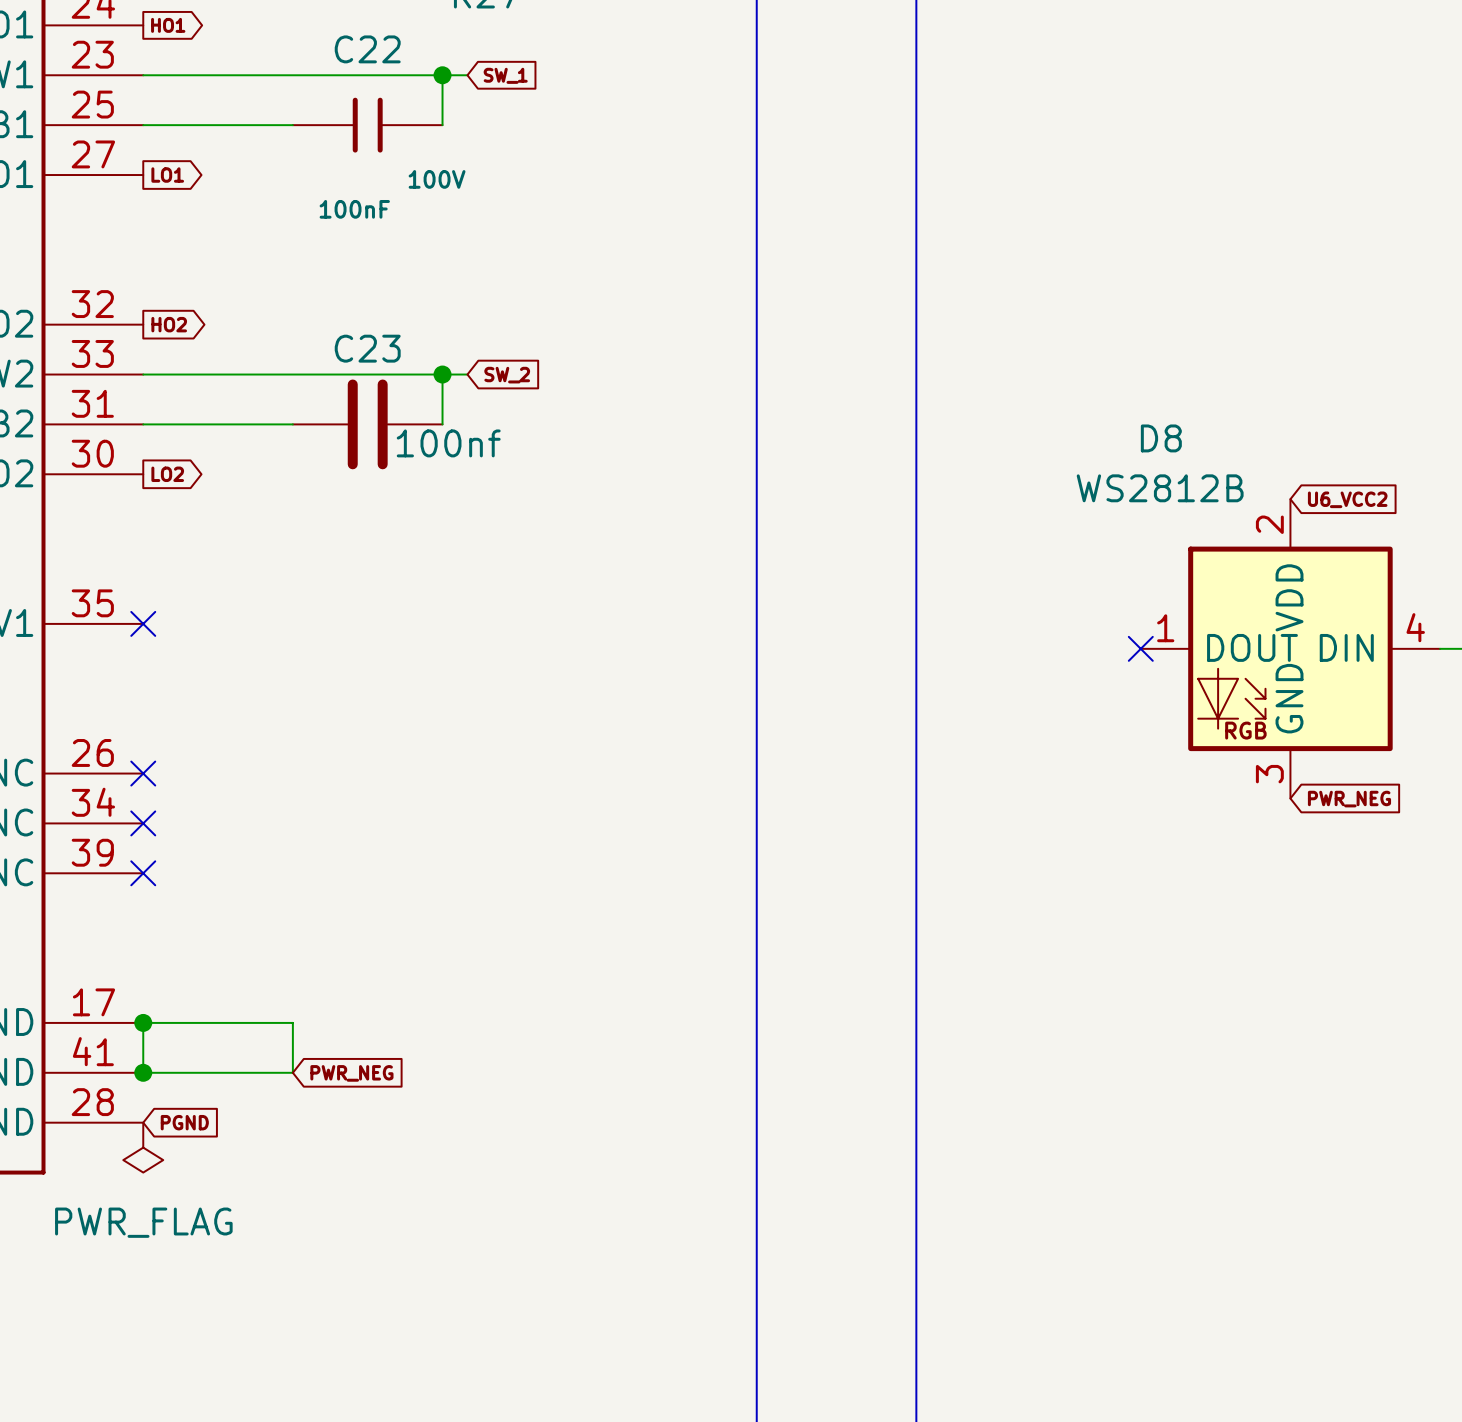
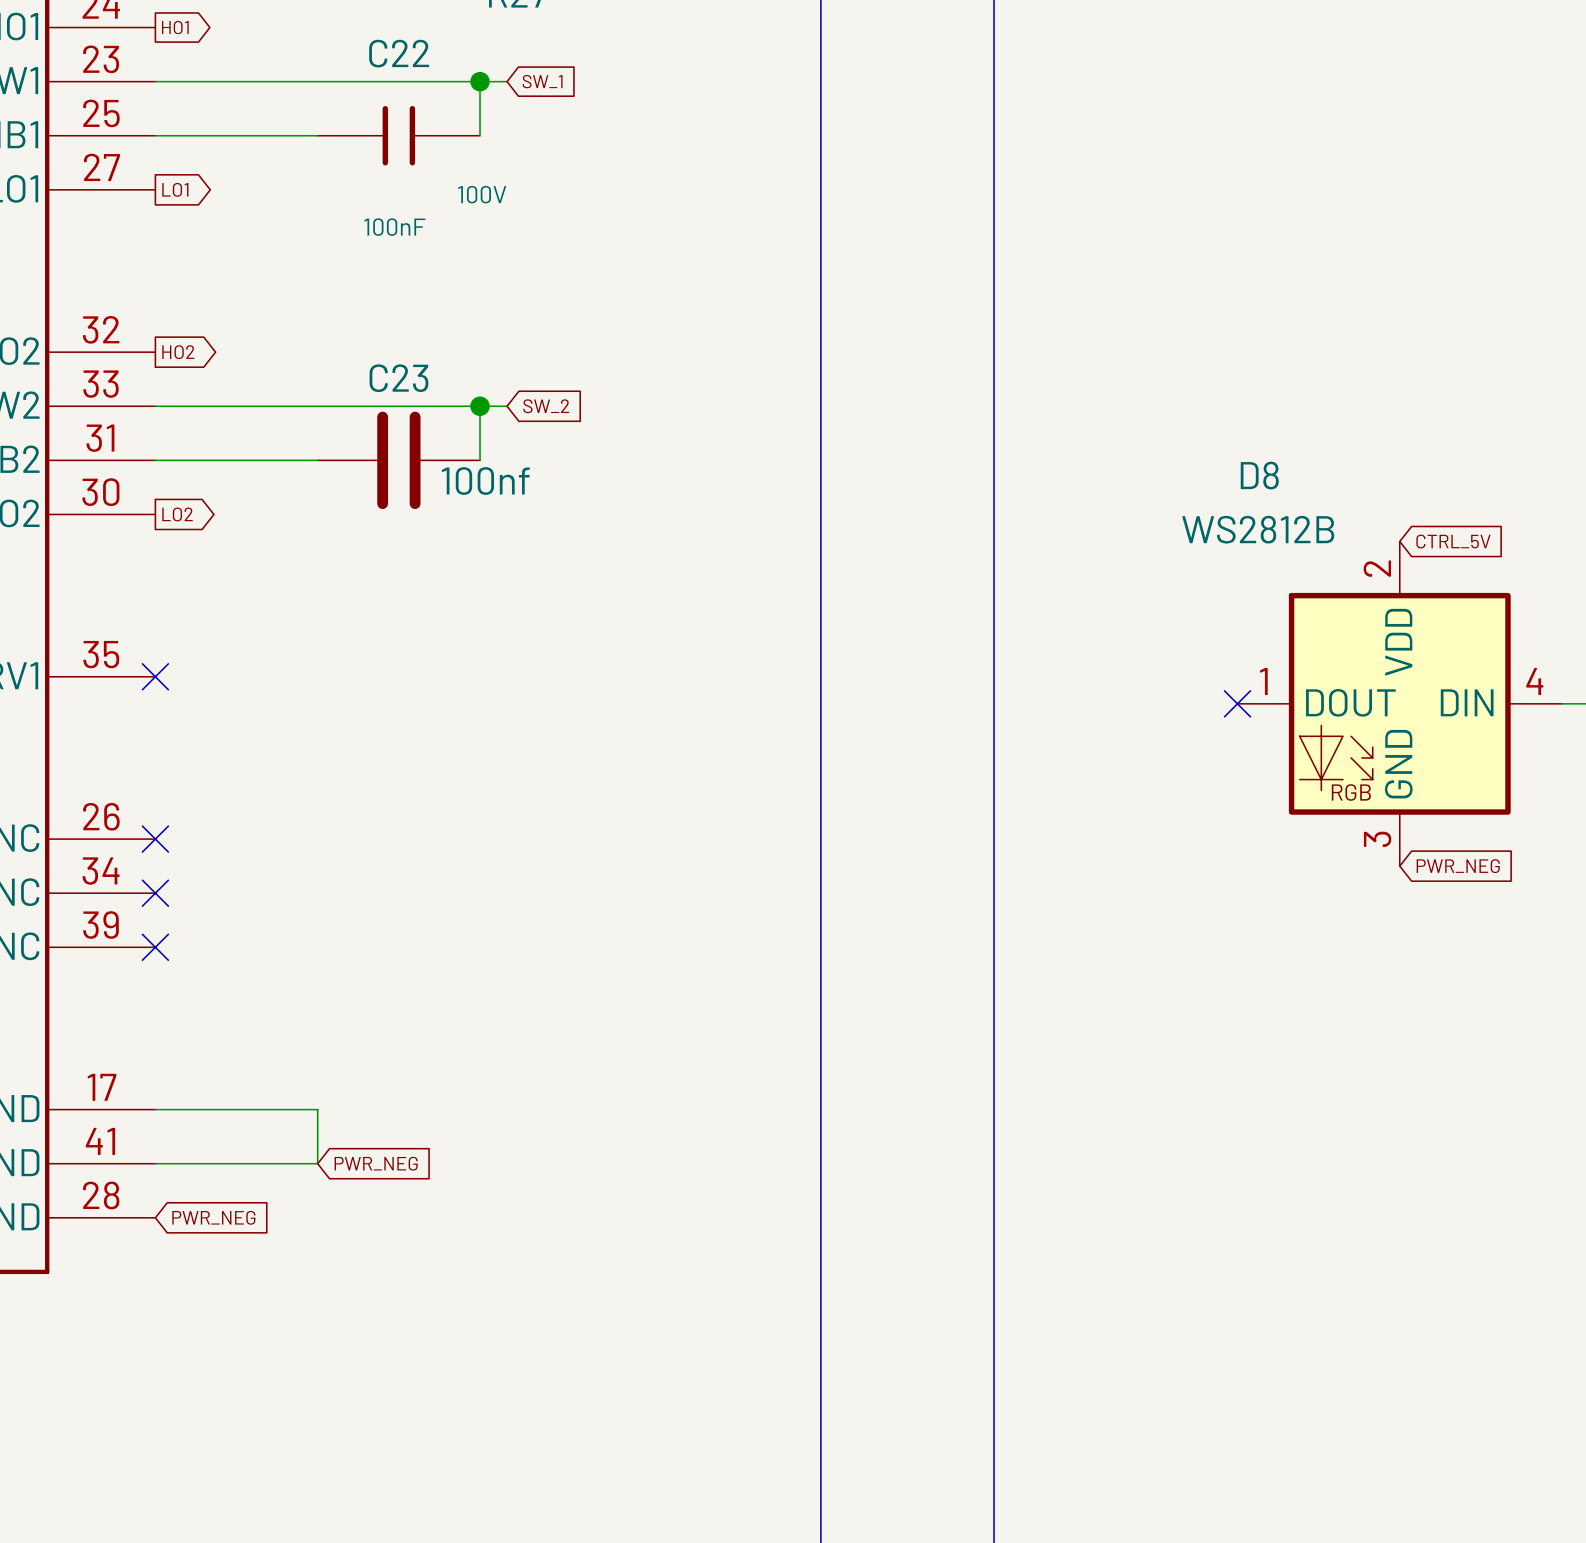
global label: U6_VCC2 (1347, 499) -> CTRL_5V (1453, 541)
wire: (143, 1022) (143, 1072) -> none
junction: (143, 1022) -> none
junction: (143, 1072) -> none
global label: PGND (184, 1122) -> PWR_NEG (213, 1217)
power symbol: PWR_FLAG (143, 1147) -> none

